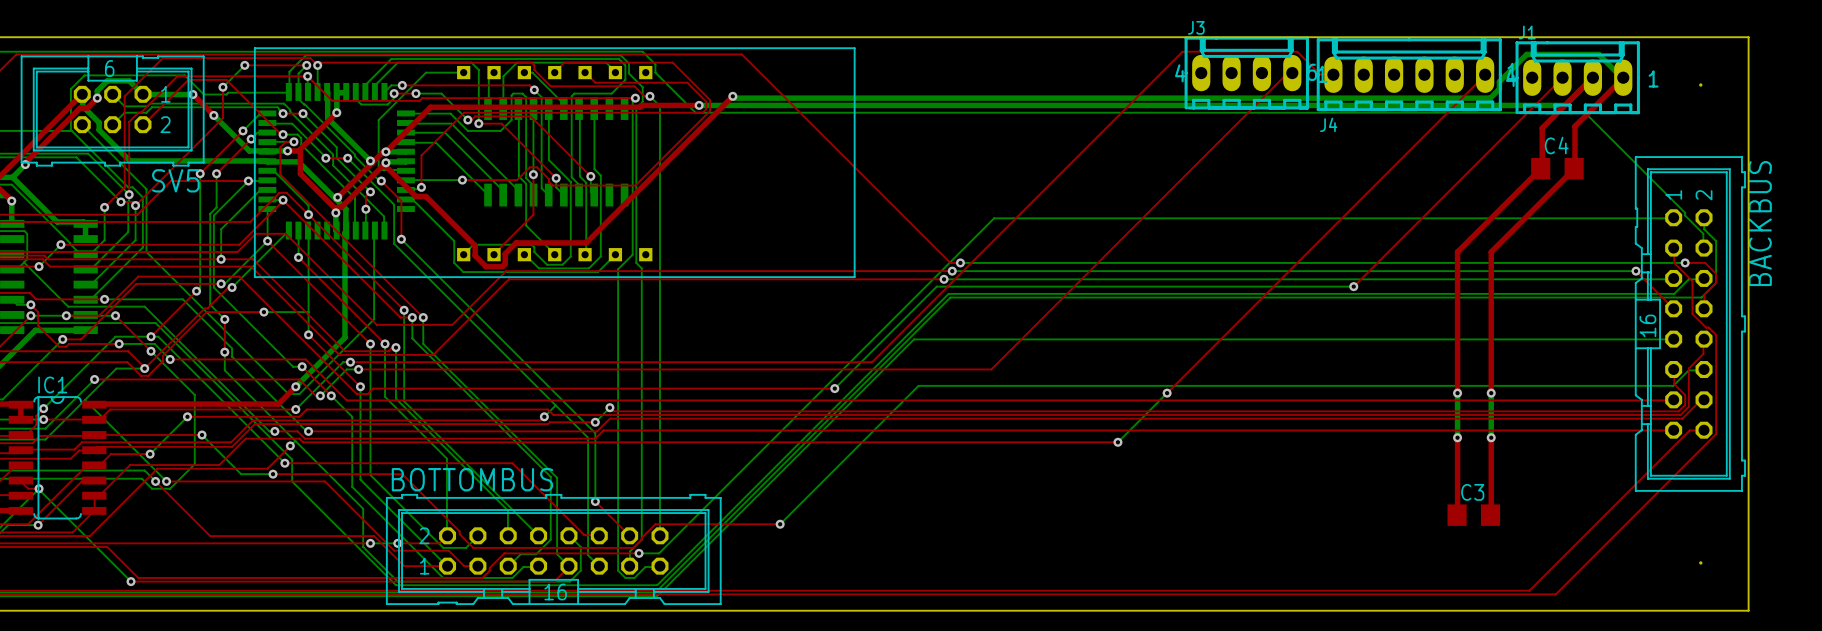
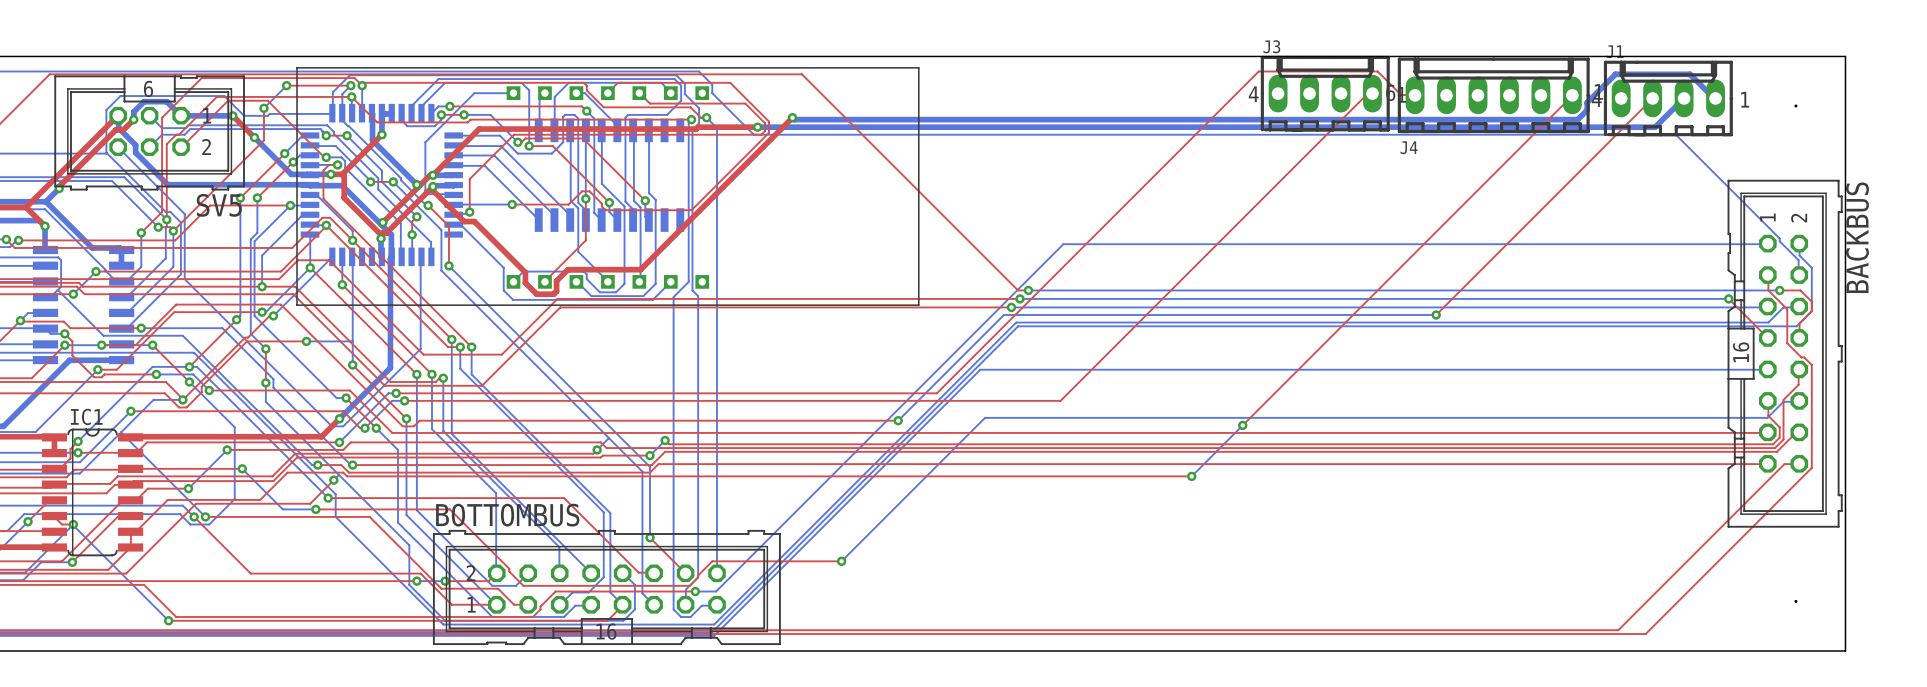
top track: (1592, 77) (1542, 128) (1542, 166) (1540, 169) (1457, 252) (1457, 393) -> none
top track: (1623, 77) (1575, 126) (1574, 169) (1491, 252) (1491, 393) -> none
C4: (1557, 168) -> none
bottom track: (1457, 393) (1457, 437) -> none
via: (1457, 393) -> none
bottom track: (1491, 393) (1491, 437) -> none
via: (1491, 393) -> none
top track: (1457, 437) (1457, 515) -> none
via: (1457, 437) -> none
top track: (1491, 437) (1490, 515) -> none
via: (1491, 437) -> none
C3: (1473, 515) -> none

